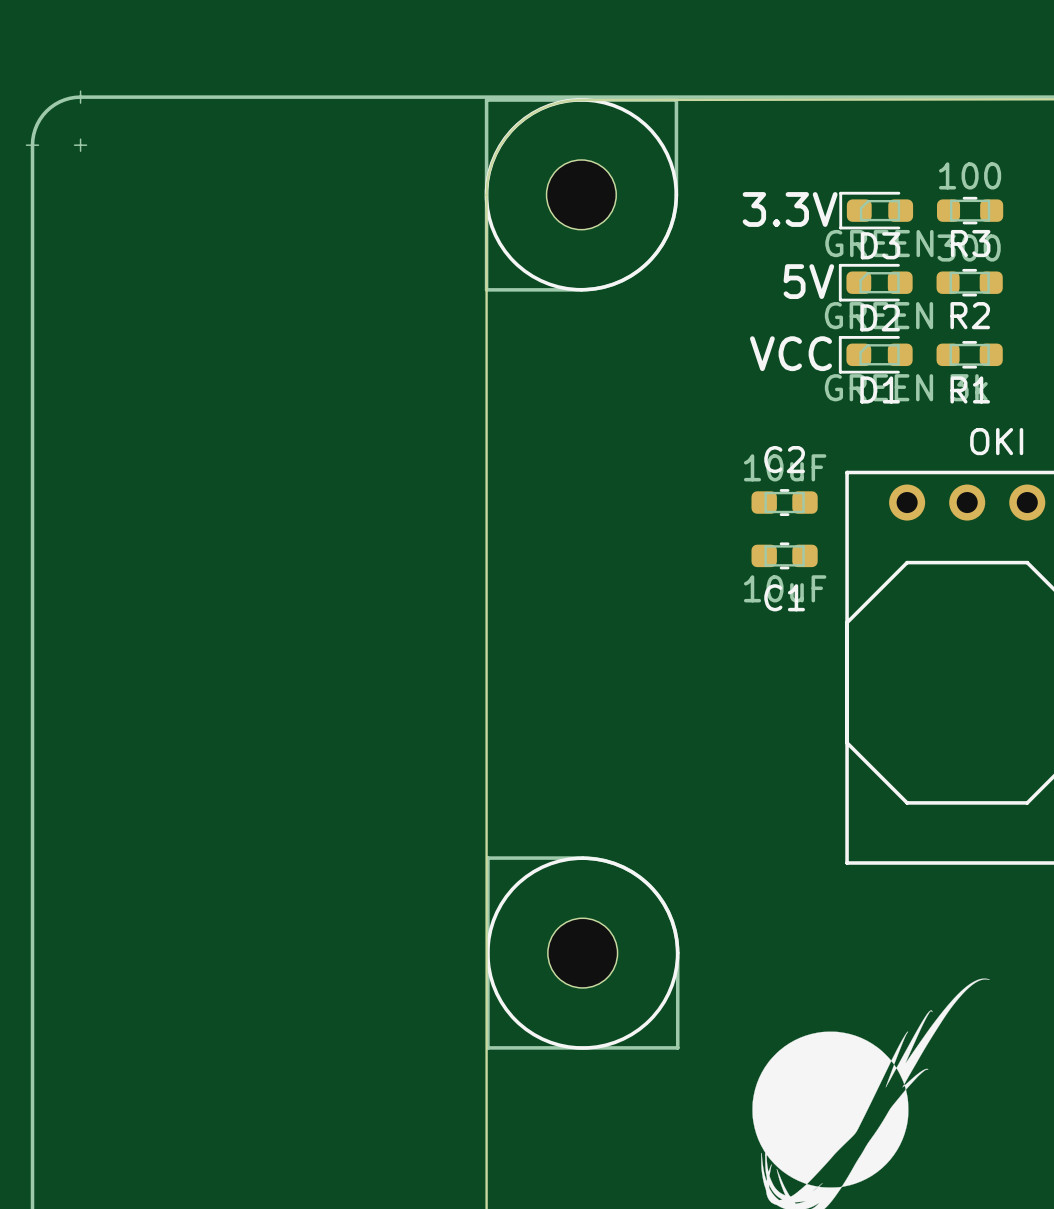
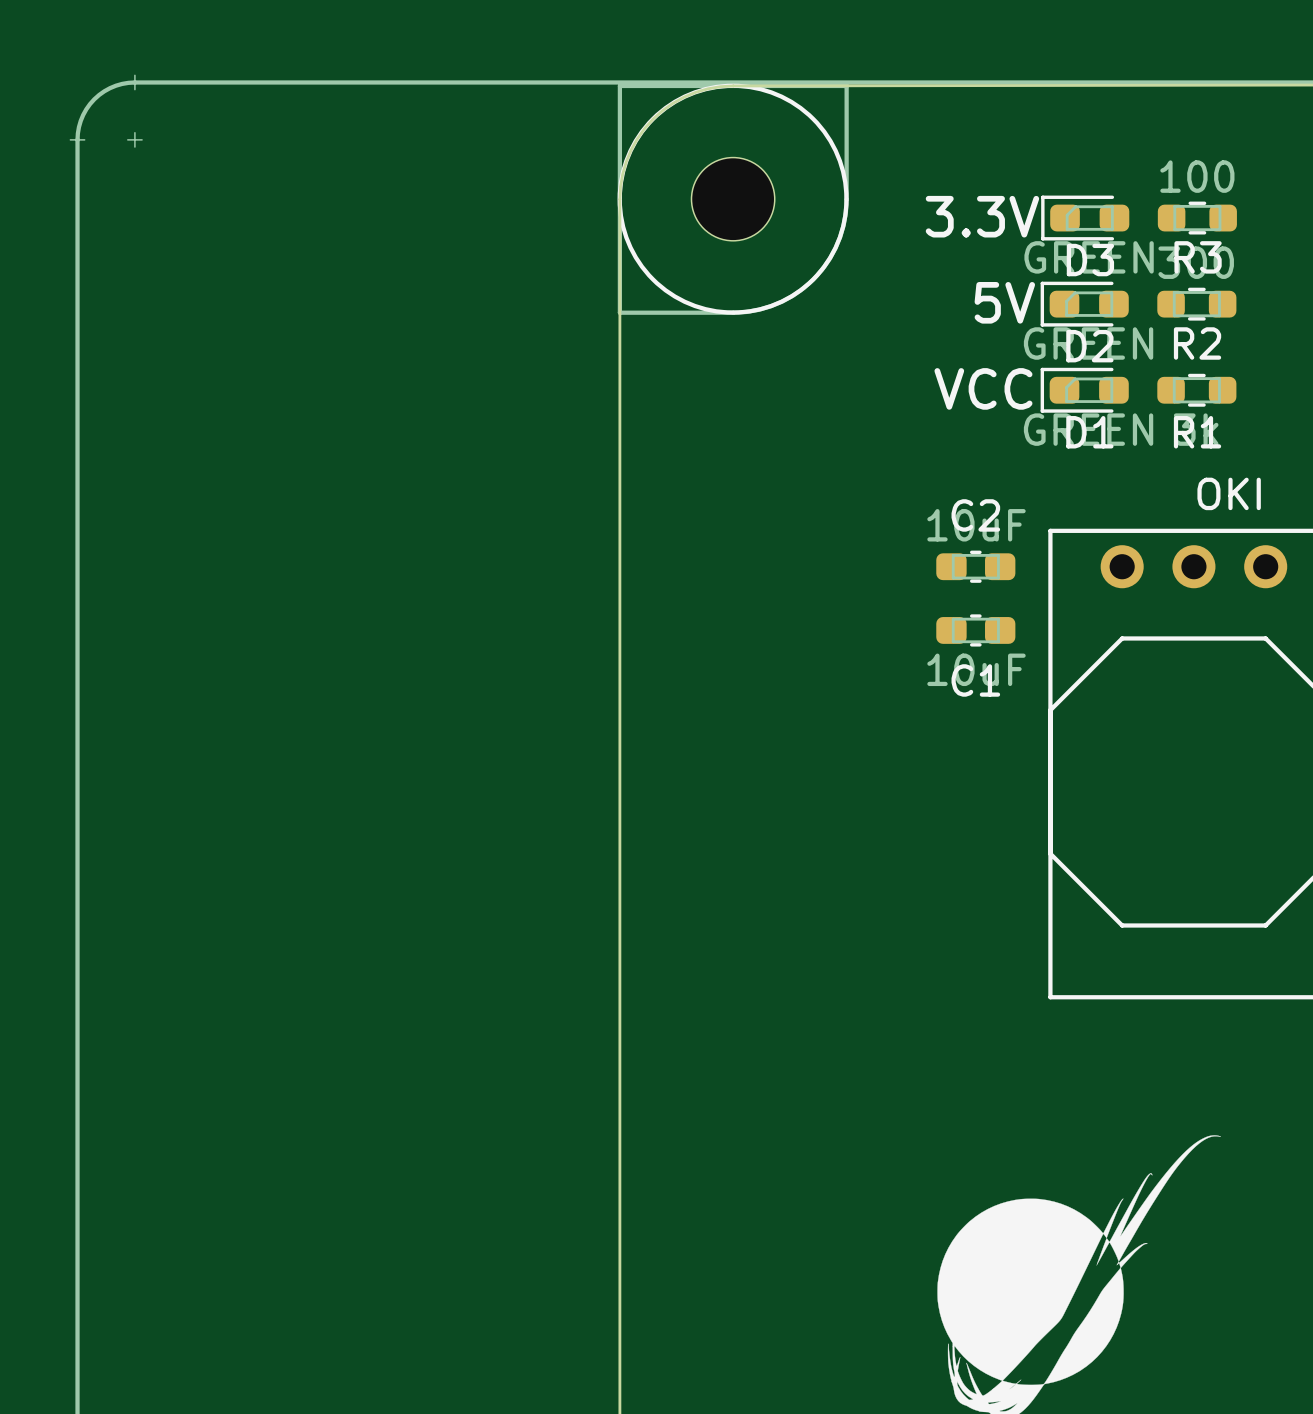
part: (582, 953) -> none

